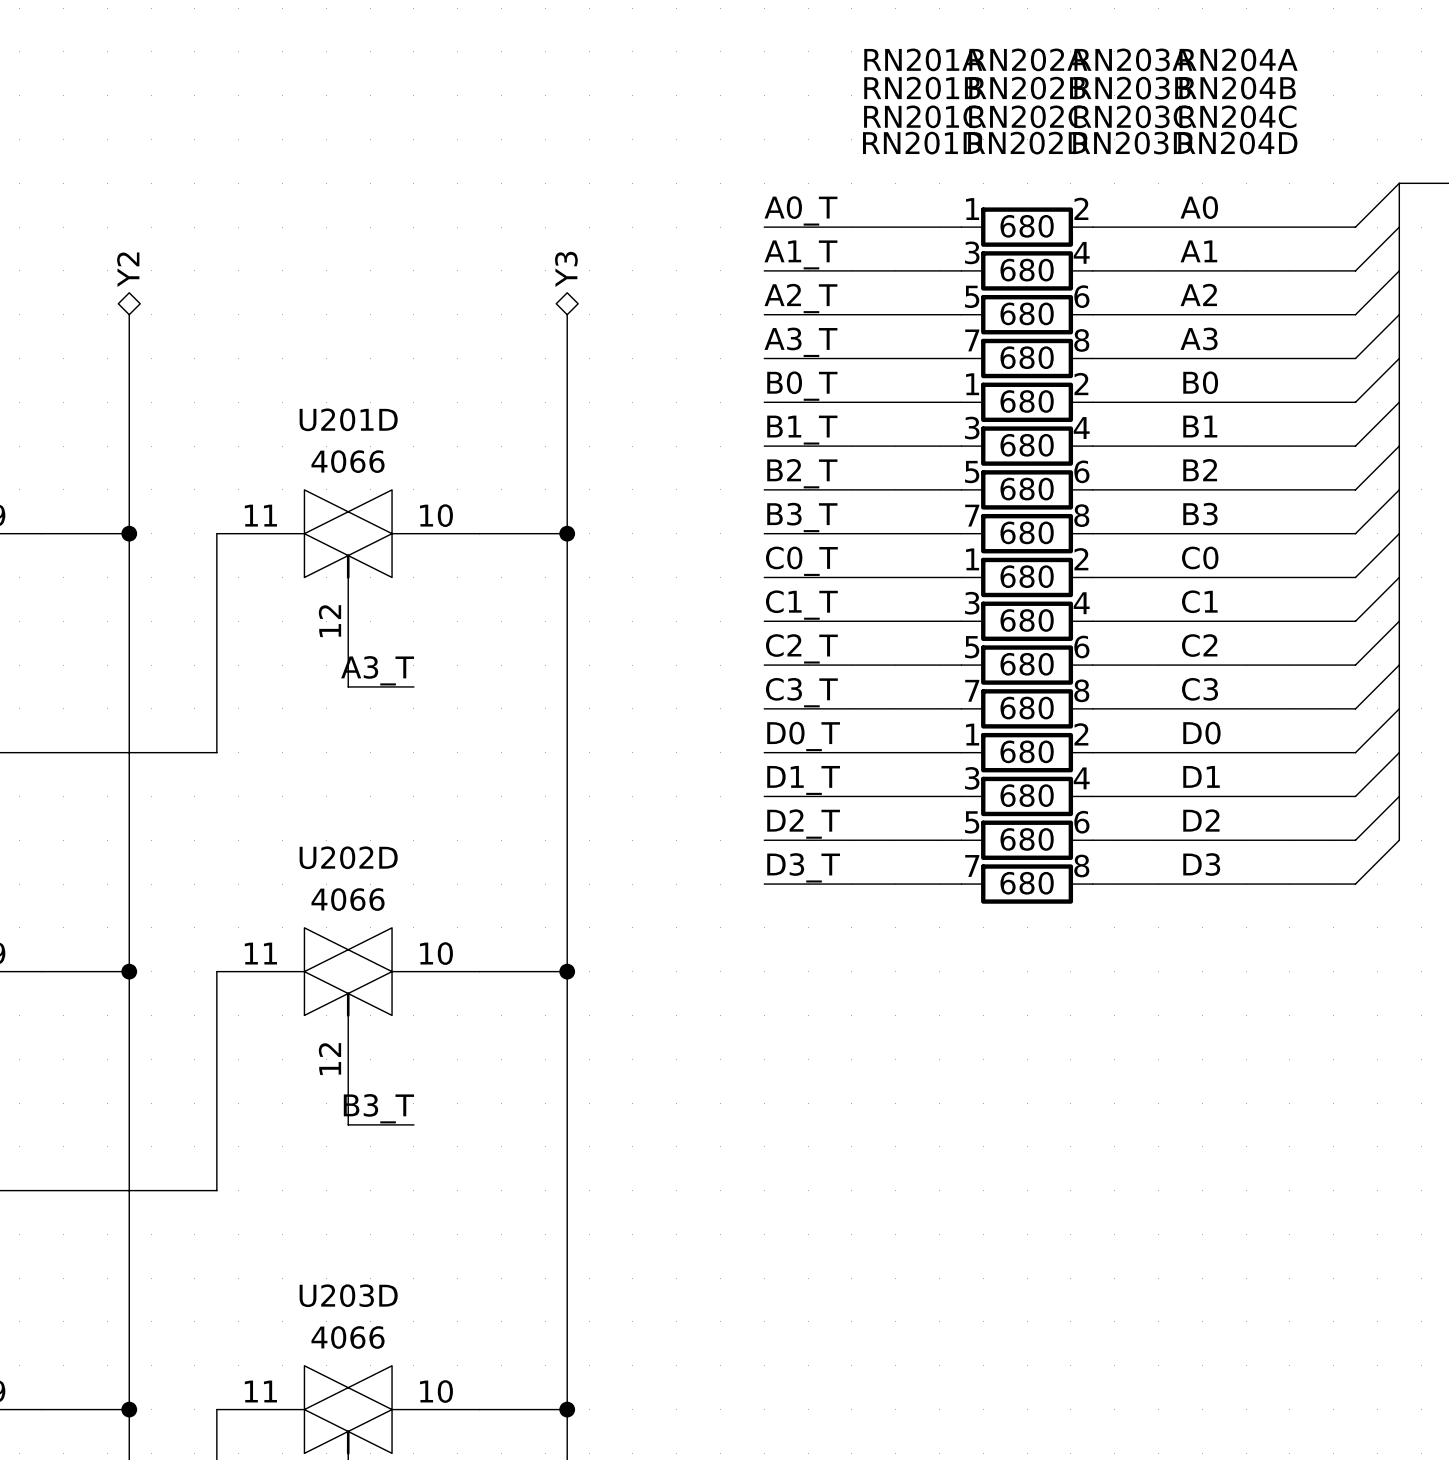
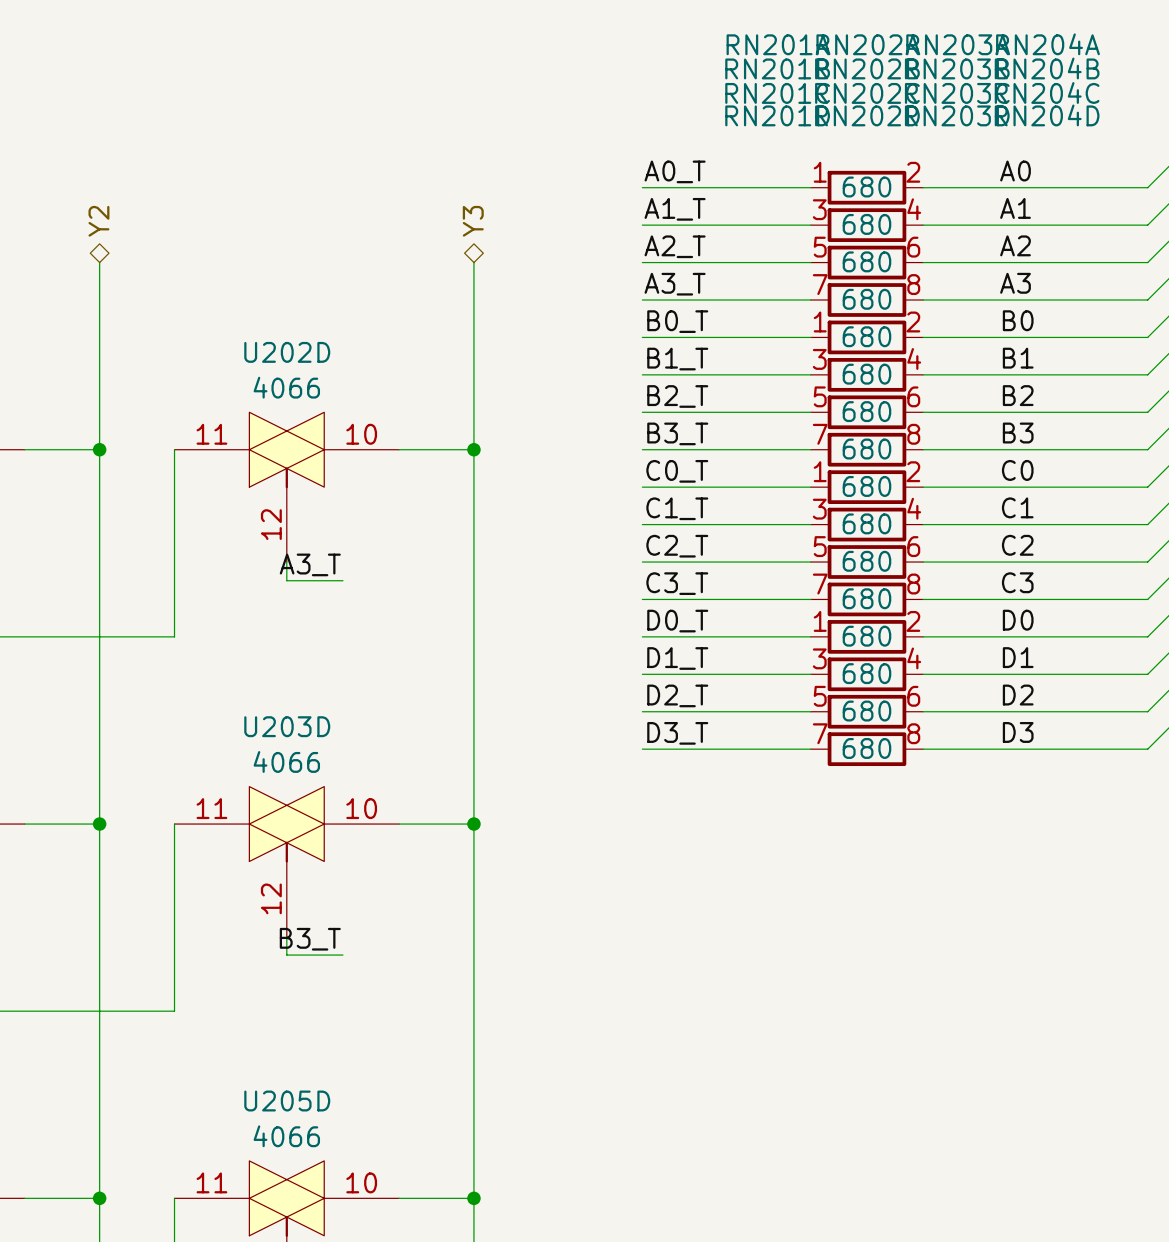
U201D name: U201D (348, 419) -> U202D (287, 352)
U202D name: U202D (348, 857) -> U203D (287, 726)
U203D name: U203D (348, 1295) -> U205D (287, 1101)

